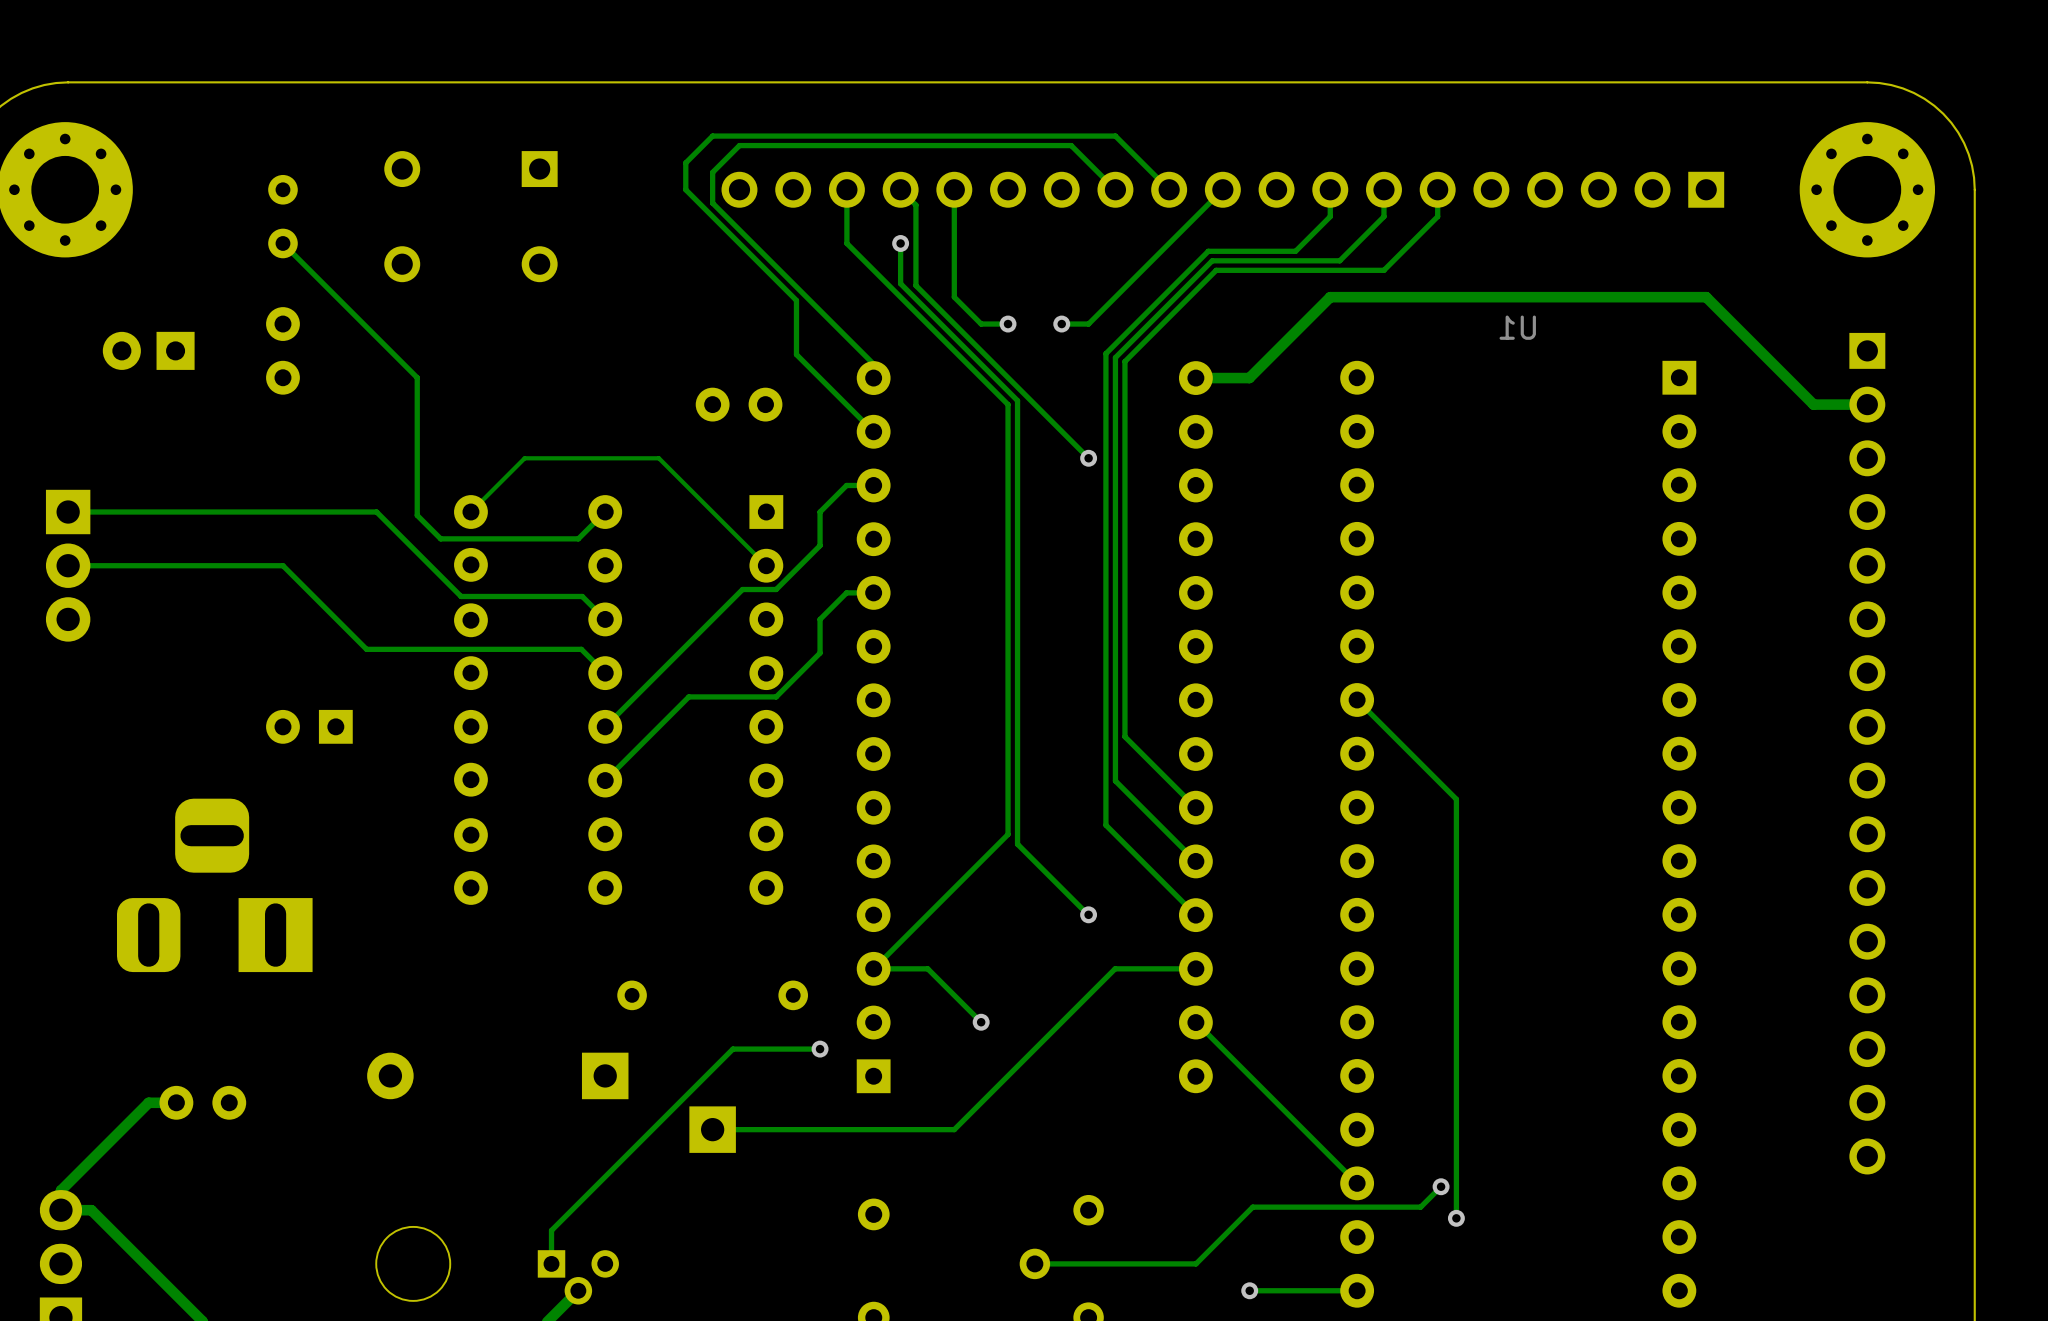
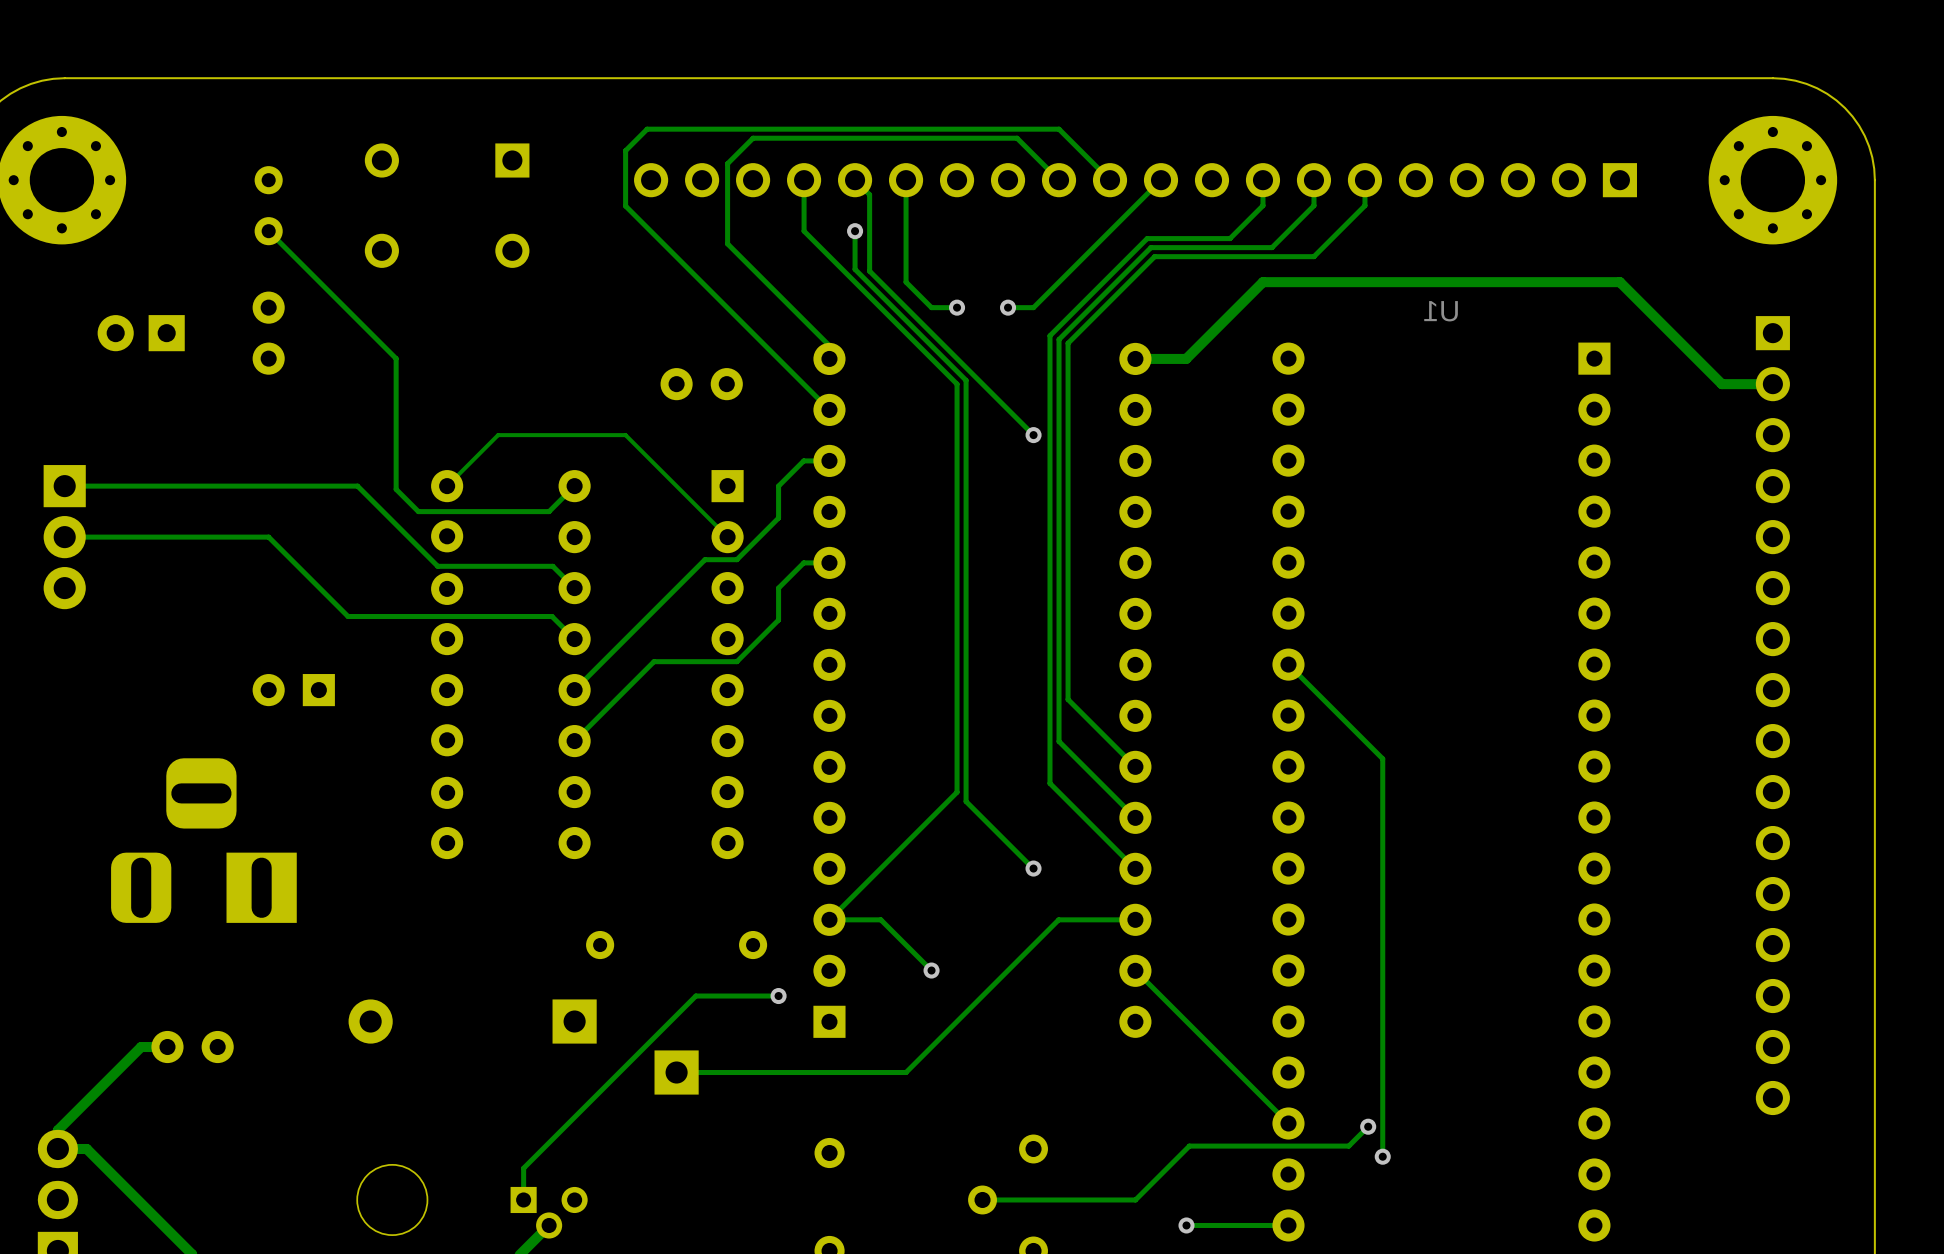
track: (712, 136) (685, 162) (685, 189) (796, 300) (796, 354) -> (676, 129) (647, 129) (625, 150) (625, 206) (756, 336)
track: (793, 145) (739, 145) (712, 172) (712, 203) (766, 256) -> (753, 138) (727, 163) (727, 243)
part: none -> (1135, 180)

